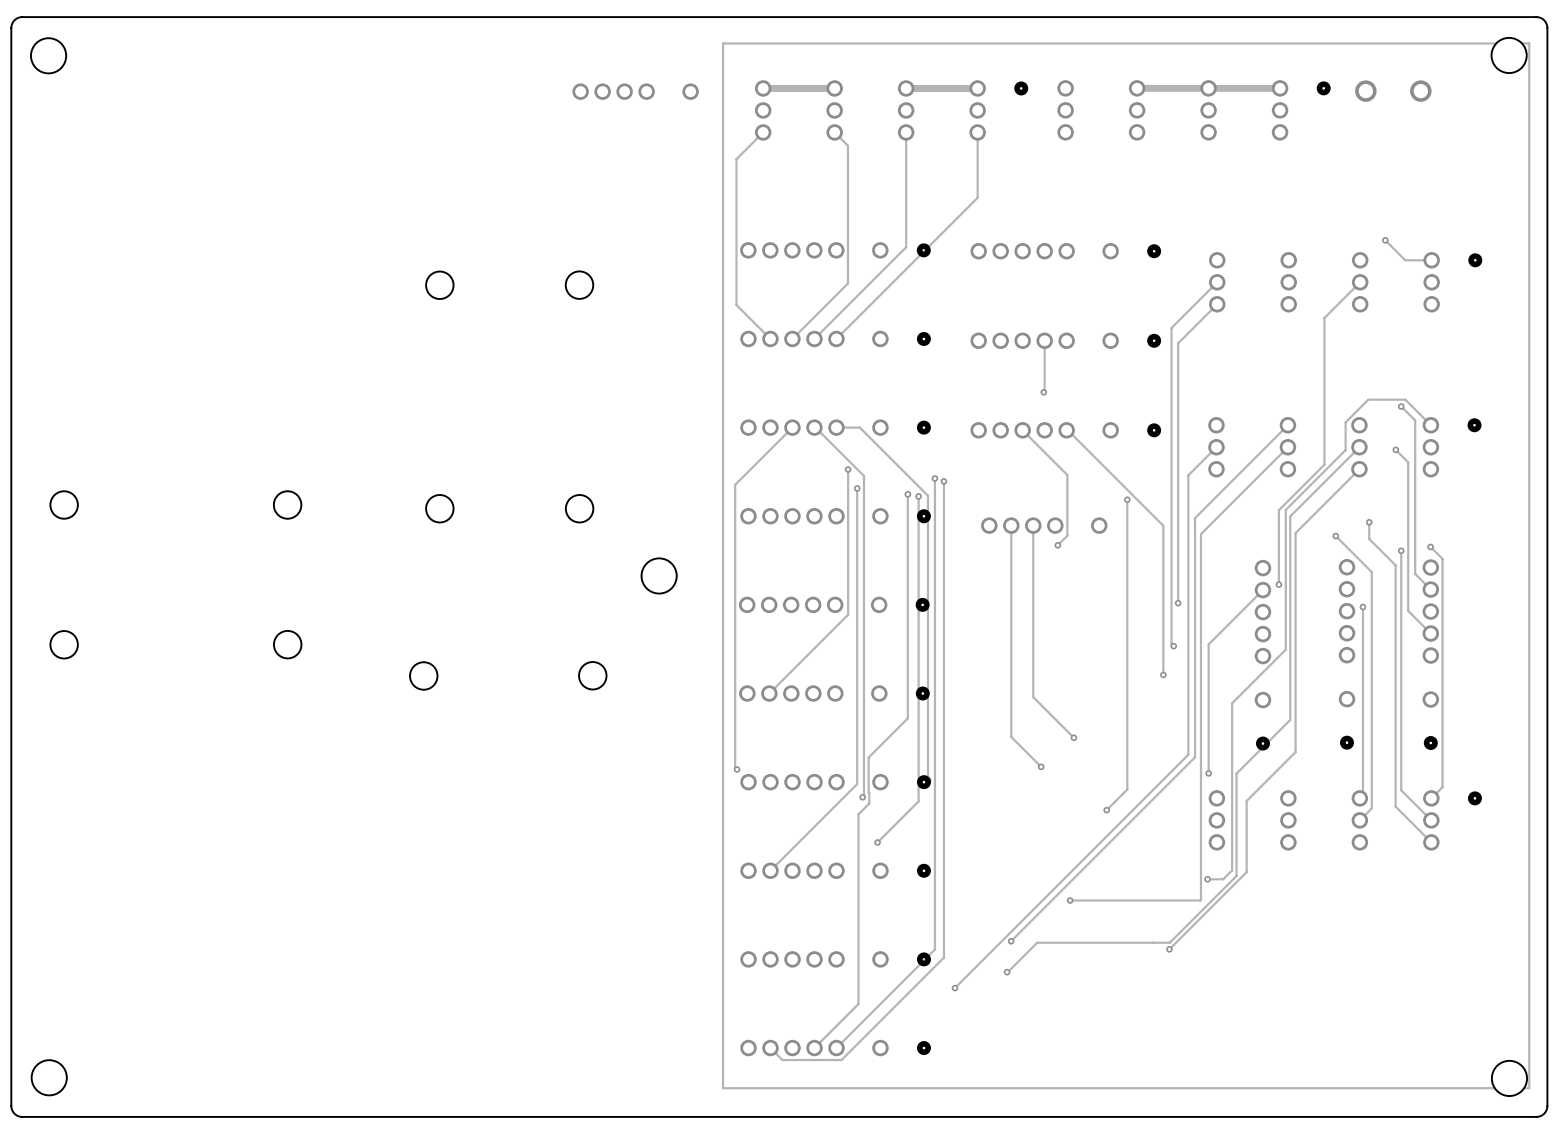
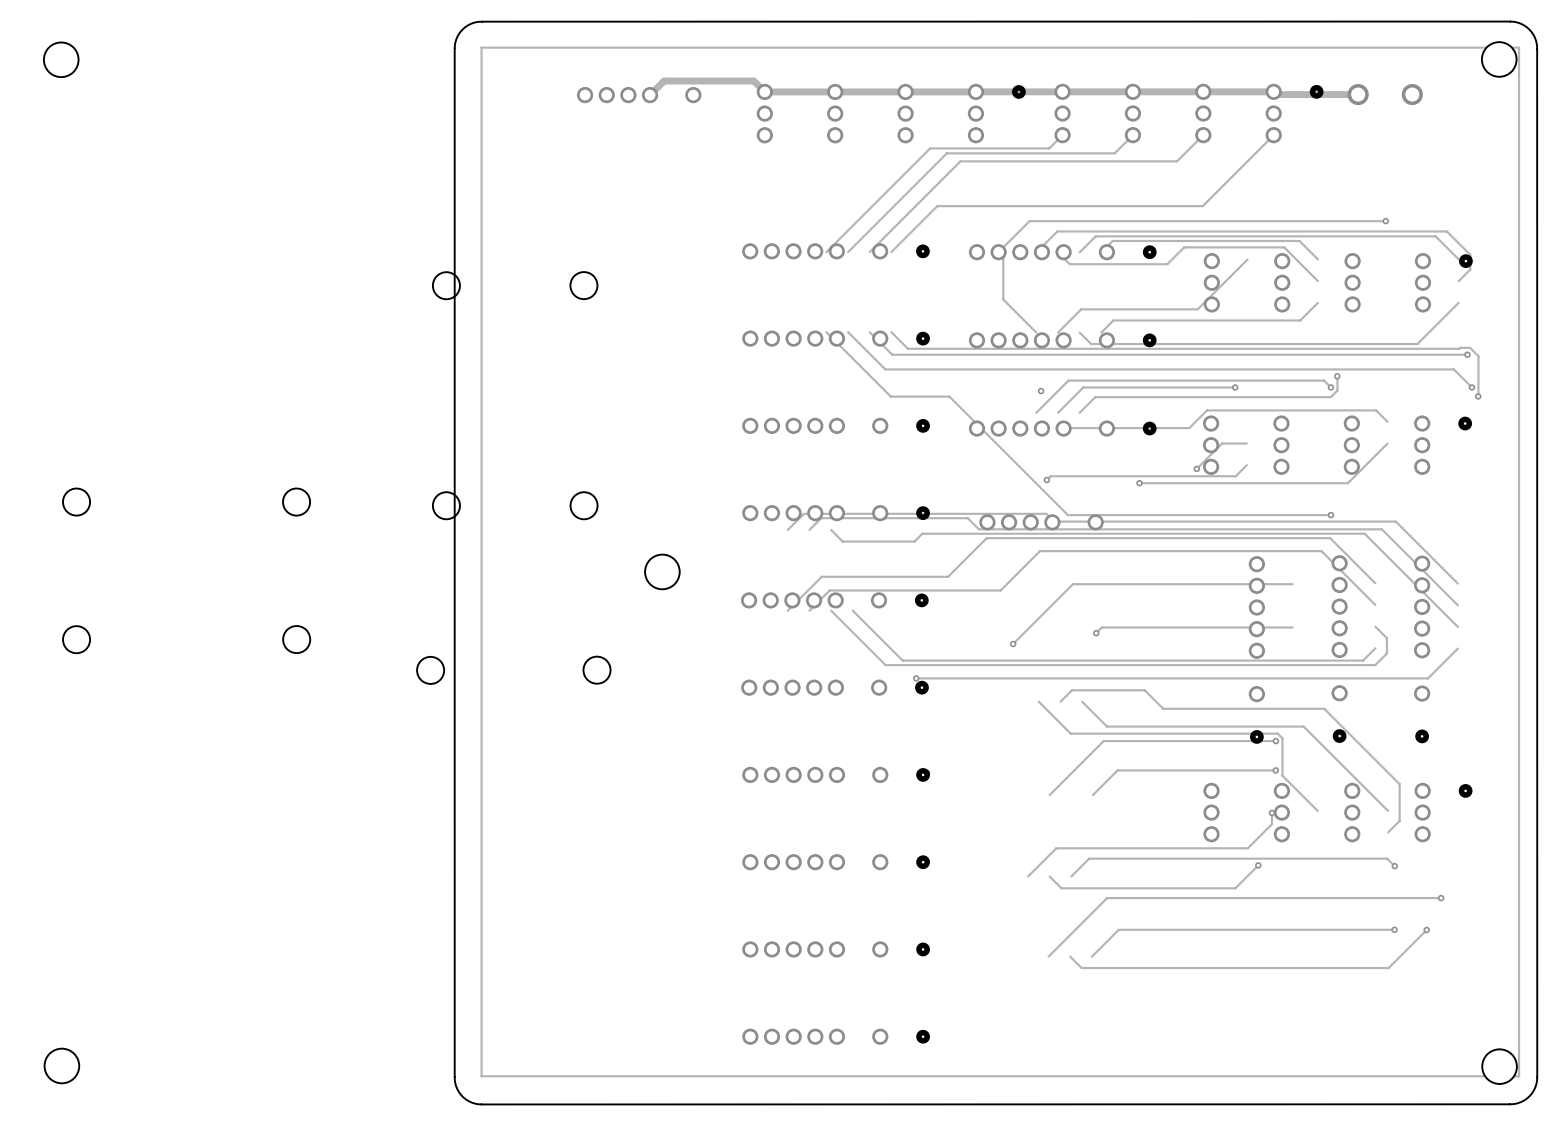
board edge: (1536, 17) (22, 17) (15, 19) (11, 28) (11, 1105) (13, 1112) (22, 1116) (1536, 1116) (1543, 1114) (1547, 1105) (1547, 28) (1544, 20) (1536, 17) -> (1510, 21) (1522, 24) (1529, 29) (1535, 40) (1537, 49) (1537, 1077) (1534, 1089) (1529, 1096) (1521, 1101) (1509, 1104) (481, 1104) (472, 1102) (462, 1096) (456, 1085) (454, 1076) (454, 48) (457, 36) (462, 29) (470, 24) (482, 21) (1510, 21)
track: (723, 43) (723, 1088) -> (725, 47) (481, 47) (481, 1076) (725, 1076)
track: none -> (764, 91) (753, 81) (664, 81) (650, 95)
track: none -> (905, 91) (835, 91)
track: none -> (1132, 91) (976, 91)
track: none -> (1273, 91) (1276, 94) (1358, 94)
track: (763, 132) (736, 159) (736, 305) (770, 338) -> none
track: (834, 132) (847, 145) (847, 283) (792, 338) -> none
track: (906, 132) (906, 247) (814, 338) -> none
track: (977, 132) (977, 197) (836, 338) -> none
track: none -> (1062, 135) (1049, 148) (930, 148) (826, 252)
track: none -> (1132, 135) (1114, 153) (946, 153) (848, 252)
track: none -> (1203, 135) (1177, 161) (960, 161) (869, 252)
track: none -> (1273, 135) (1202, 206) (937, 206) (891, 252)
track: none -> (1385, 221) (1029, 221) (1003, 247) (1003, 299) (1036, 332)
track: (1385, 240) (1405, 260) (1431, 260) -> none
via position: (1385, 240) -> (1385, 221)
track: none -> (1036, 252) (1057, 231) (1446, 231) (1470, 254) (1470, 269) (1458, 281)
track: none -> (1058, 252) (1069, 264) (1167, 264) (1184, 247) (1284, 247) (1317, 281)
track: none -> (1079, 252) (1095, 236) (1435, 236) (1458, 259)
track: none -> (1101, 252) (1112, 240) (1299, 240) (1317, 259)
track: none -> (1247, 259) (1197, 309) (1081, 309) (1058, 332)
track: (1217, 282) (1171, 327) (1171, 643) (1173, 646) -> none
track: (1360, 282) (1324, 318) (1324, 464) (1278, 510) (1278, 584) -> none
track: none -> (1317, 302) (1300, 320) (1113, 320) (1101, 332)
track: none -> (1458, 302) (1417, 344) (1091, 344) (1079, 332)
track: (1217, 304) (1178, 343) (1178, 603) -> none
track: none -> (826, 332) (890, 396) (949, 396) (1067, 515) (1330, 515)
track: none -> (848, 332) (885, 369) (1453, 369) (1471, 387)
track: none -> (869, 332) (892, 354) (1467, 354)
track: none -> (891, 332) (908, 348) (1470, 347) (1478, 356) (1478, 396)
track: (1044, 340) (1043, 392) -> none
via: none -> (1467, 354)
track: none -> (1337, 376) (1337, 390) (1330, 397) (1095, 397) (1079, 412)
via: none -> (1337, 376)
track: none -> (1235, 387) (1083, 387) (1058, 412)
via: none -> (1235, 387)
track: none -> (1330, 387) (1324, 380) (1068, 380) (1036, 412)
via: none -> (1330, 387)
via: none -> (1471, 387)
via: none -> (1478, 396)
track: (1401, 406) (1415, 420) (1415, 573) (1430, 589) -> none
via: (1401, 406) -> none
track: none -> (1387, 421) (1376, 410) (1207, 410) (1189, 428) (1060, 428)
track: (1287, 425) (1195, 518) (1195, 757) (1011, 941) -> none
track: (1430, 425) (1405, 399) (1368, 399) (1345, 422) (1345, 450) (1285, 509) (1285, 649) (1232, 703) (1232, 870) (1223, 879) (1207, 879) -> none
track: (792, 427) (735, 484) (735, 767) (737, 769) -> none
track: (814, 427) (863, 476) (862, 797) -> none
track: (836, 427) (859, 427) (927, 495) (927, 780) -> none
track: (1022, 430) (1067, 475) (1067, 535) (1057, 545) -> none
track: (1066, 430) (1163, 525) (1163, 674) -> none
track: none -> (1246, 443) (1222, 443) (1196, 468)
track: none -> (1387, 443) (1347, 483) (1139, 483)
track: (1216, 447) (1188, 475) (1188, 754) (954, 988) -> none
track: (1287, 447) (1200, 534) (1200, 899) (1070, 900) -> none
track: (1359, 447) (1290, 516) (1290, 719) (1236, 773) (1236, 876) (1169, 942) (1153, 942) -> none
track: (1395, 449) (1408, 462) (1408, 610) (1430, 633) -> none
via: (1395, 449) -> none
track: none -> (1246, 465) (1235, 476) (1050, 476) (1046, 480)
track: (848, 469) (848, 614) (769, 693) -> none
via: (848, 469) -> none
track: (1359, 469) (1295, 533) (1295, 752) (1246, 800) (1246, 872) (1169, 949) -> none
via: none -> (1196, 468)
track: (934, 478) (934, 949) (836, 1048) -> none
via: (934, 478) -> none
track: (943, 481) (943, 957) (841, 1060) (782, 1060) (770, 1048) -> none
via: (943, 481) -> none
via: none -> (1046, 480)
track: (857, 488) (857, 784) (770, 870) -> none
via: (857, 488) -> none
track: (907, 494) (907, 718) (868, 757) (869, 803) (858, 814) (858, 1004) (814, 1048) -> none
via: (907, 494) -> none
track: (918, 496) (918, 801) (877, 842) -> none
via: (918, 496) -> none
track: (1127, 499) (1127, 789) (1106, 810) -> none
via position: (1127, 499) -> (1139, 483)
via: none -> (1330, 515)
track: (1369, 522) (1369, 539) (1395, 565) (1395, 806) (1431, 842) -> none
via: (1369, 522) -> none
track: (1011, 525) (1011, 736) (1041, 766) -> none
track: (1033, 525) (1033, 697) (1073, 737) -> none
track: none -> (787, 529) (803, 513) (1046, 513) (1054, 521) (1395, 521) (1457, 583)
track: none -> (809, 529) (821, 518) (967, 518) (978, 529) (1381, 529) (1457, 605)
track: none -> (831, 529) (842, 541) (914, 541) (922, 533) (1364, 533) (1457, 626)
track: (1335, 536) (1371, 572) (1371, 808) (1359, 820) -> none
via: (1335, 536) -> none
via: (1057, 545) -> none
track: (1430, 546) (1442, 558) (1442, 787) (1431, 798) -> none
via: (1430, 546) -> none
track: (1401, 550) (1401, 790) (1431, 820) -> none
via: (1401, 550) -> none
via: (1278, 584) -> none
track: none -> (1375, 583) (1330, 538) (986, 538) (948, 576) (821, 576) (787, 610)
track: none -> (1292, 584) (1073, 584) (1013, 644)
track: (1262, 590) (1208, 644) (1208, 773) -> none
via: (1178, 603) -> none
track: (1362, 607) (1362, 795) (1359, 798) -> none
via: (1362, 607) -> none
track: none -> (1375, 604) (1321, 551) (1040, 551) (1000, 590) (829, 590) (809, 610)
track: none -> (831, 610) (885, 665) (1375, 665) (1386, 653) (1386, 638) (1375, 626)
track: none -> (852, 610) (902, 660) (1363, 660) (1375, 648)
track: none -> (1292, 627) (1101, 627) (1096, 633)
via: none -> (1096, 633)
via: (1173, 646) -> none
via: none -> (1013, 644)
track: none -> (1457, 648) (1428, 678) (916, 678)
via: (1163, 674) -> none
via: none -> (916, 678)
track: none -> (1038, 701) (1070, 733) (1277, 733) (1282, 738) (1282, 775) (1317, 810)
track: none -> (1060, 701) (1071, 690) (1144, 690) (1163, 708) (1324, 708) (1399, 784) (1399, 820) (1388, 832)
track: none -> (1082, 701) (1106, 726) (1303, 726) (1388, 810)
via: (1073, 737) -> none
track: none -> (1275, 741) (1103, 741) (1049, 795)
via: none -> (1275, 741)
via: (1041, 766) -> none
via: (737, 769) -> none
via: (1208, 773) -> none
track: none -> (1275, 770) (1117, 770) (1093, 795)
via: none -> (1275, 770)
via: (862, 797) -> none
via: (1106, 810) -> none
track: none -> (1271, 812) (1271, 824) (1247, 848) (1056, 848) (1028, 876)
via: none -> (1271, 812)
via: (877, 842) -> none
track: none -> (1258, 865) (1235, 888) (1061, 888) (1049, 876)
via: none -> (1258, 865)
track: none -> (1394, 866) (1387, 858) (1089, 858) (1071, 876)
via: none -> (1394, 866)
via: (1207, 879) -> none
via: (1070, 900) -> none
track: none -> (1441, 898) (1107, 898) (1048, 956)
via: none -> (1441, 898)
track: none -> (1394, 929) (1118, 929) (1091, 956)
via: none -> (1394, 929)
track: none -> (1426, 930) (1388, 968) (1081, 968) (1070, 956)
via: none -> (1426, 930)
via: (1011, 941) -> none
track: (1153, 942) (1037, 942) (1007, 972) -> none
via: (1169, 949) -> none
via: (1007, 972) -> none
via: (954, 988) -> none

